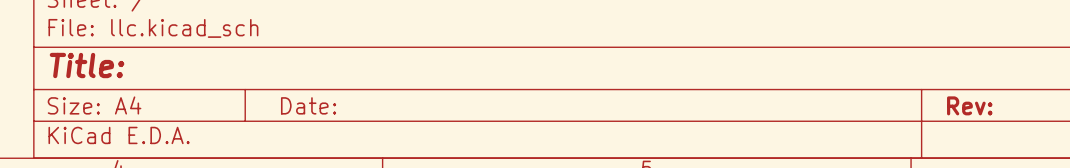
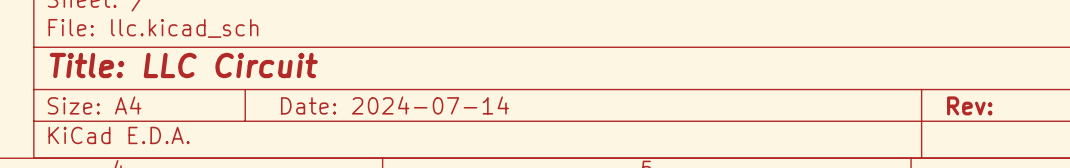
title block: Title: (87, 65) -> Title: LLC Circuit (183, 65)
title block: Date: (308, 105) -> Date: 2024-07-14 (395, 105)

